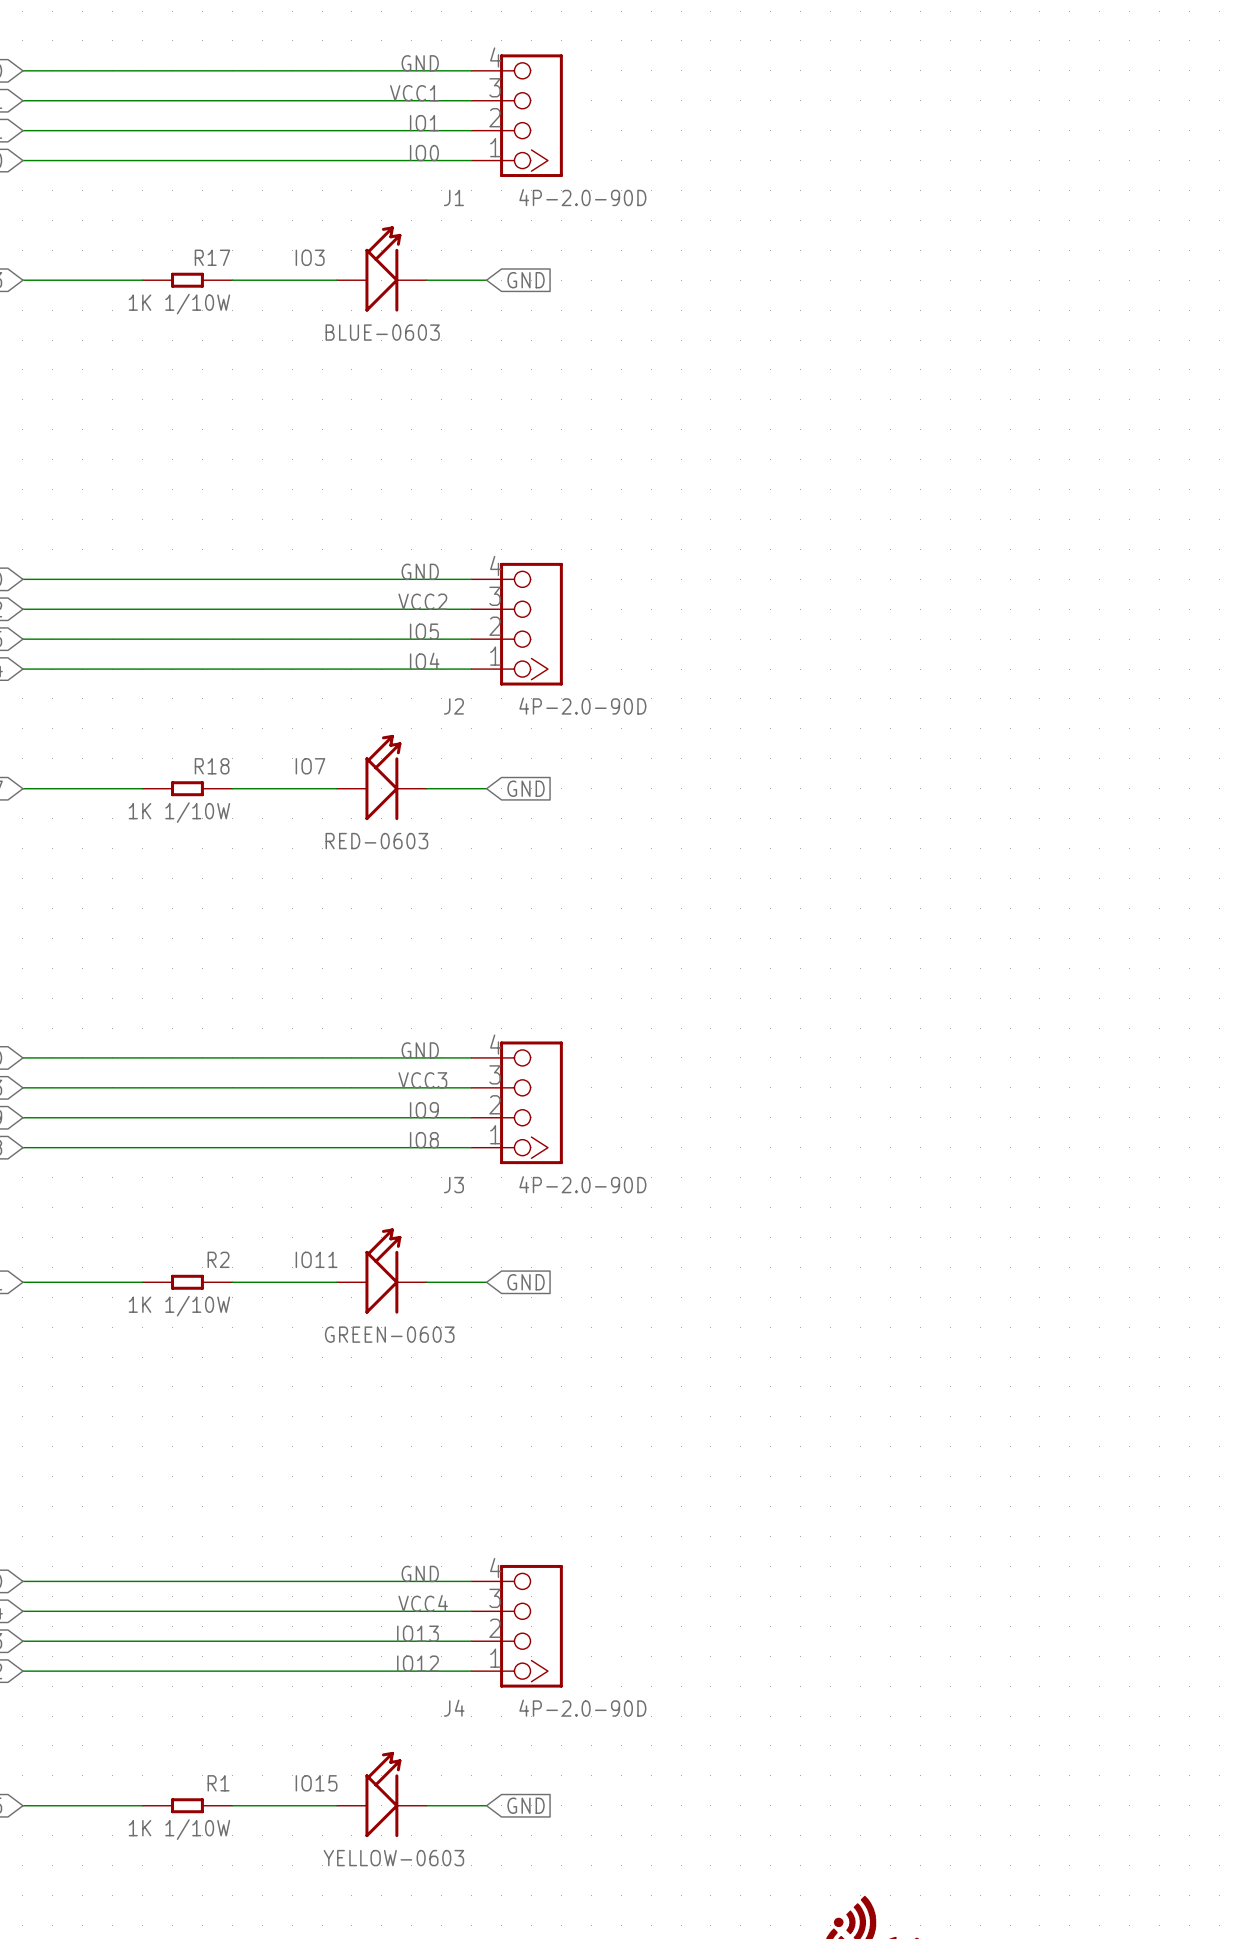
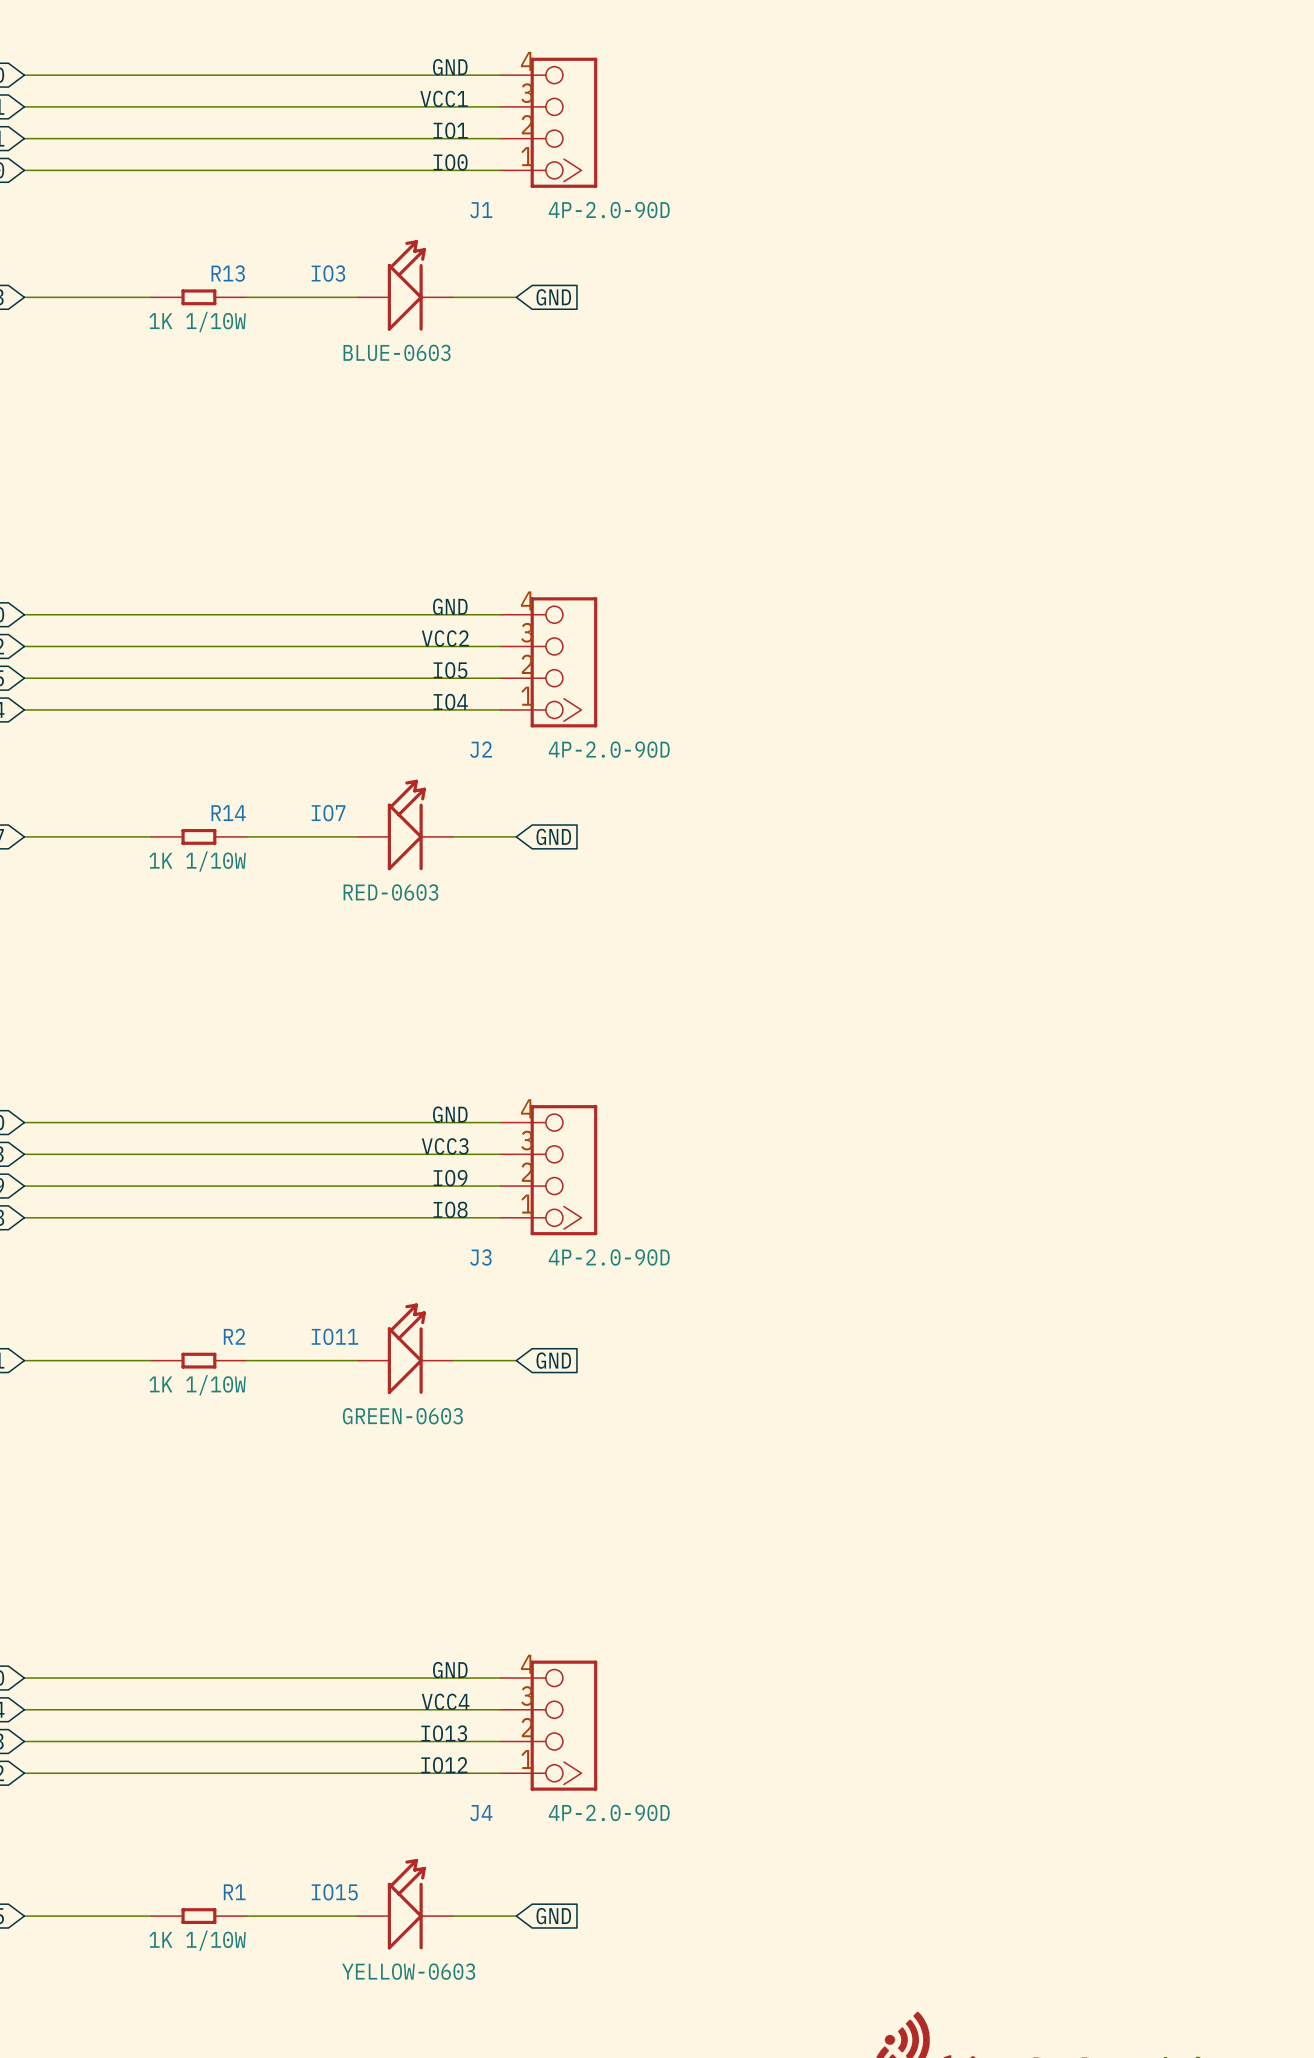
R17 name: R17 (212, 257) -> R13 (228, 273)
R18 name: R18 (212, 766) -> R14 (228, 813)

